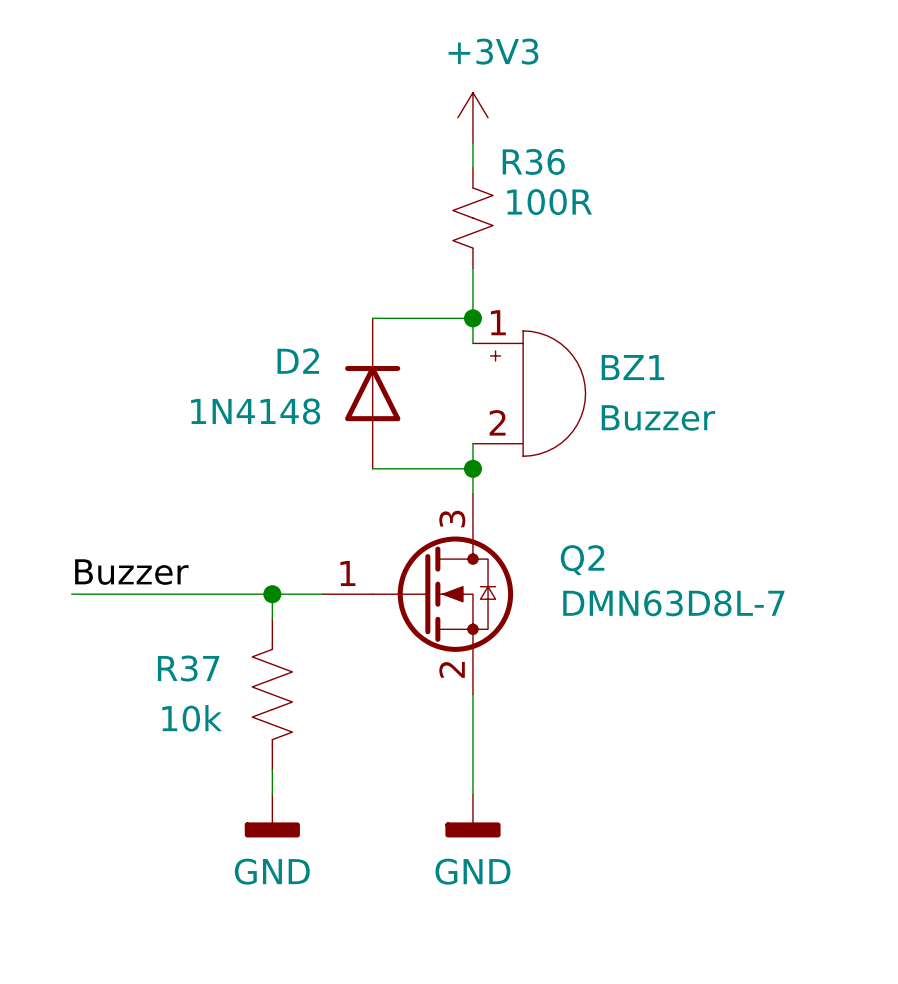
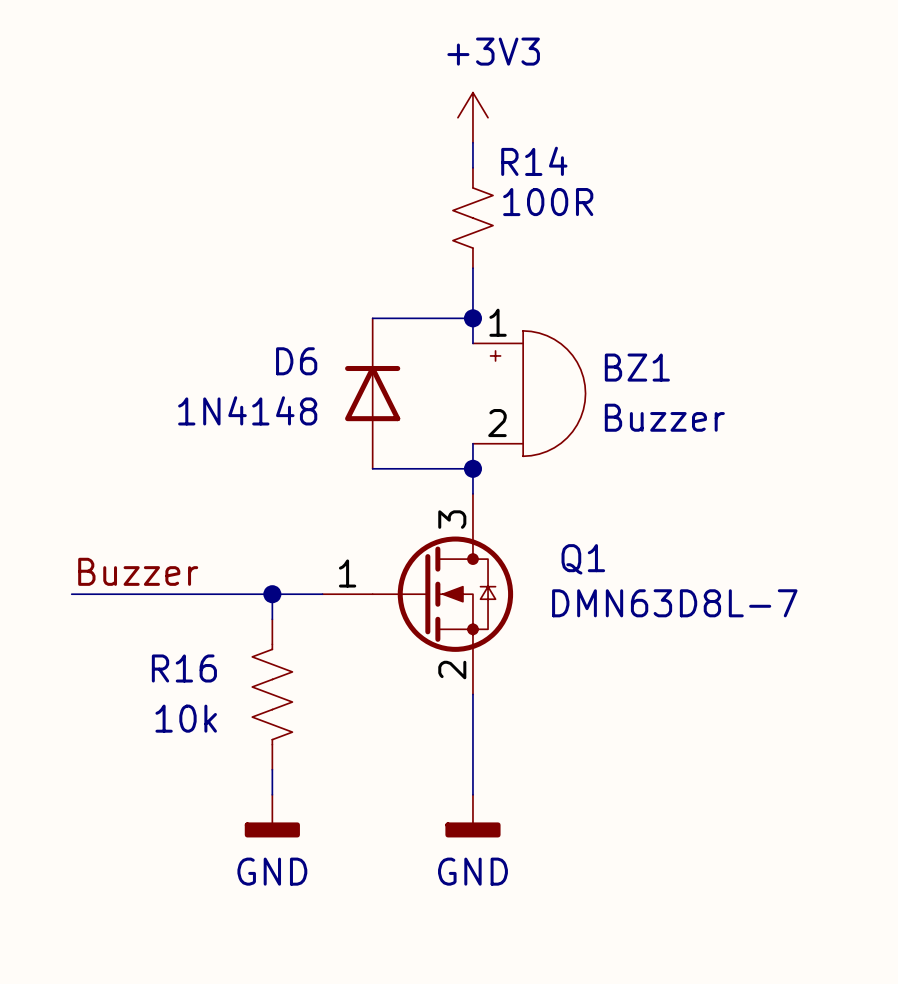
R36 name: R36 (533, 161) -> R14 (534, 161)
D2 name: D2 (298, 361) -> D6 (296, 361)
Q2 name: Q2 (582, 560) -> Q1 (583, 559)
R37 name: R37 (188, 668) -> R16 (184, 668)

